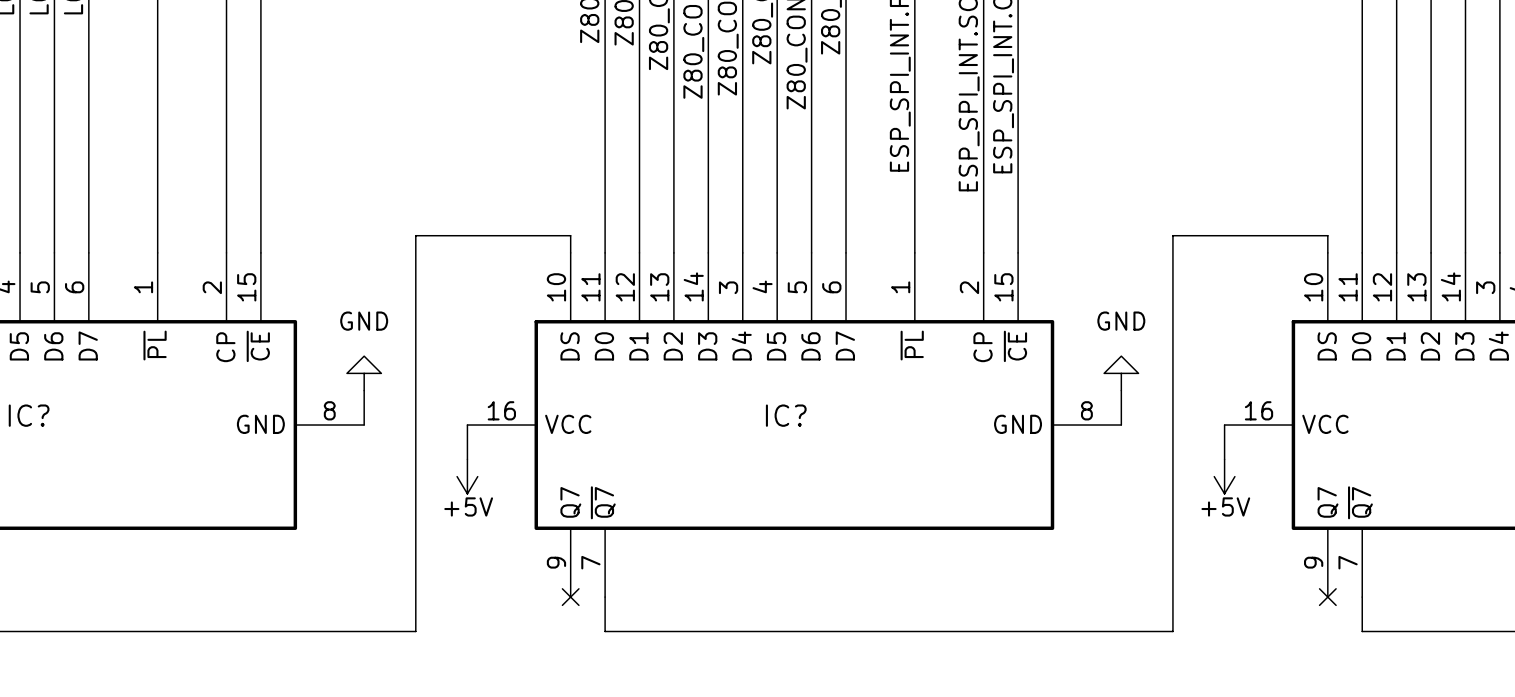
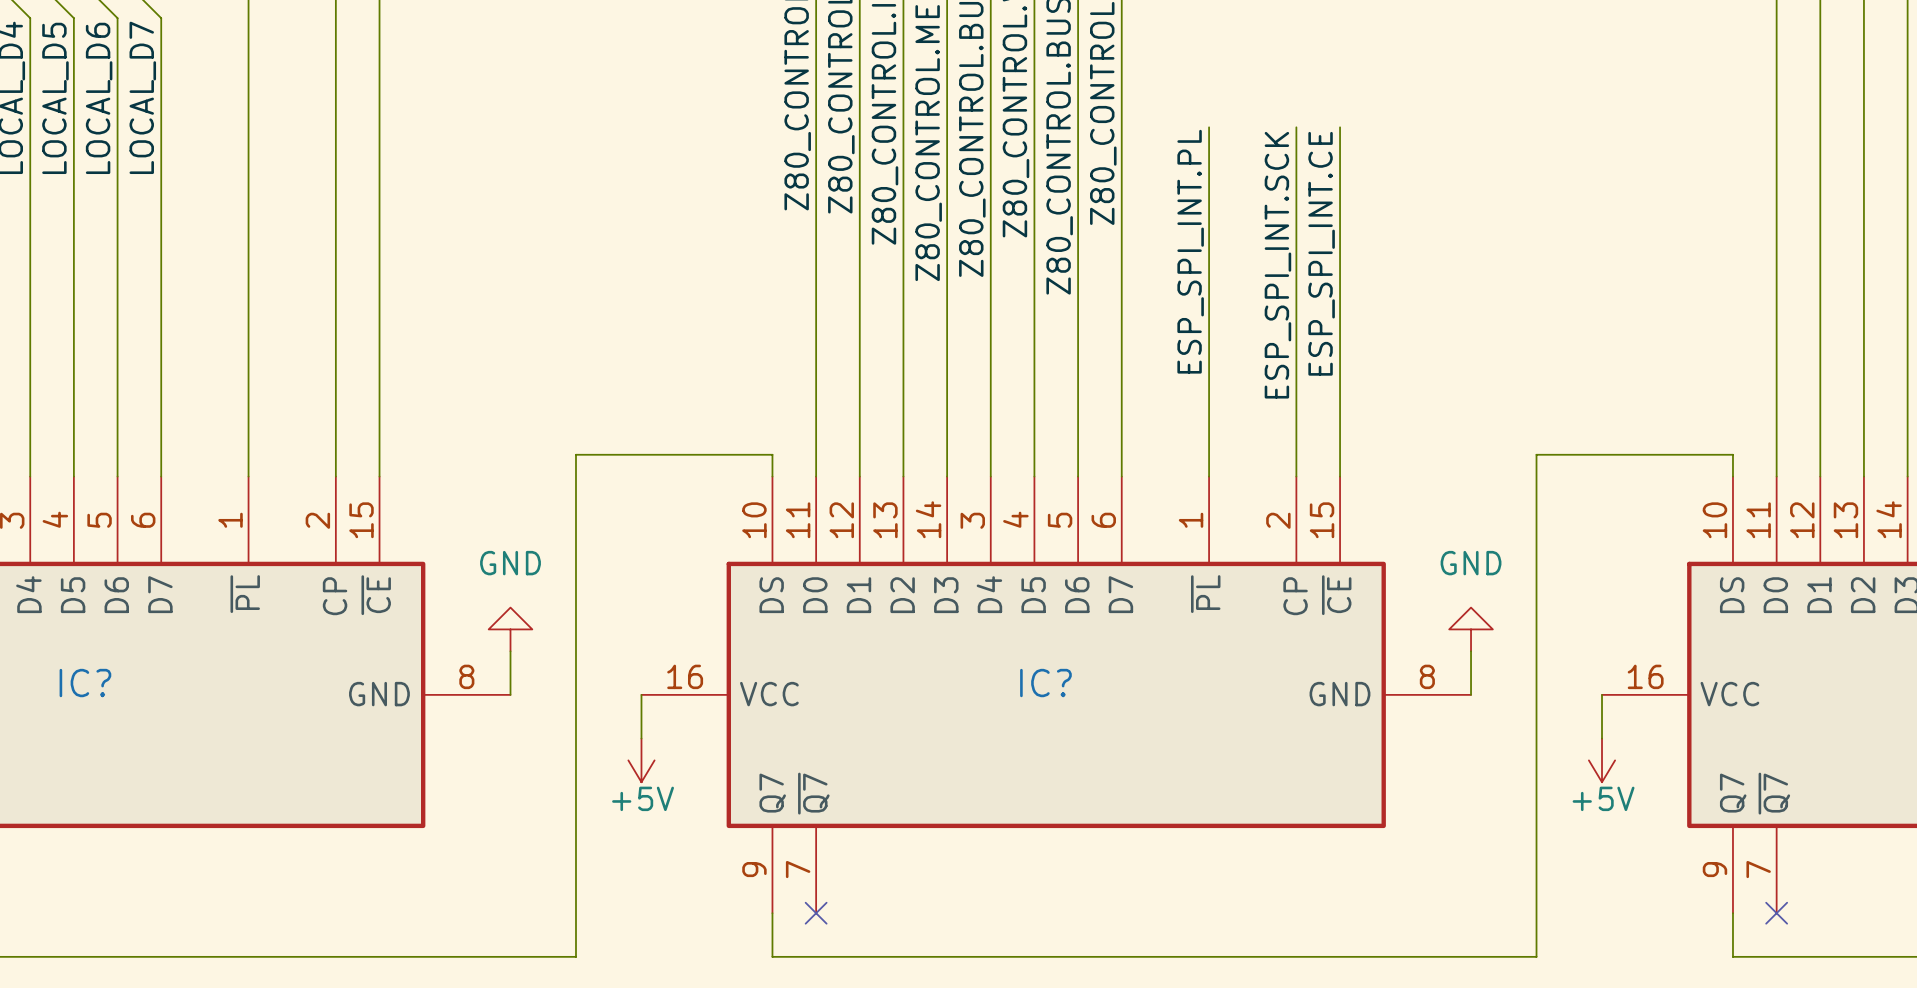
no-connect mark position: (570, 597) -> (816, 913)
wire: (605, 597) (605, 631) -> (772, 913) (772, 956) (816, 956)
no-connect mark position: (1327, 597) -> (1776, 913)
wire: (1362, 597) (1362, 631) -> (1732, 913) (1732, 956) (1776, 956)

